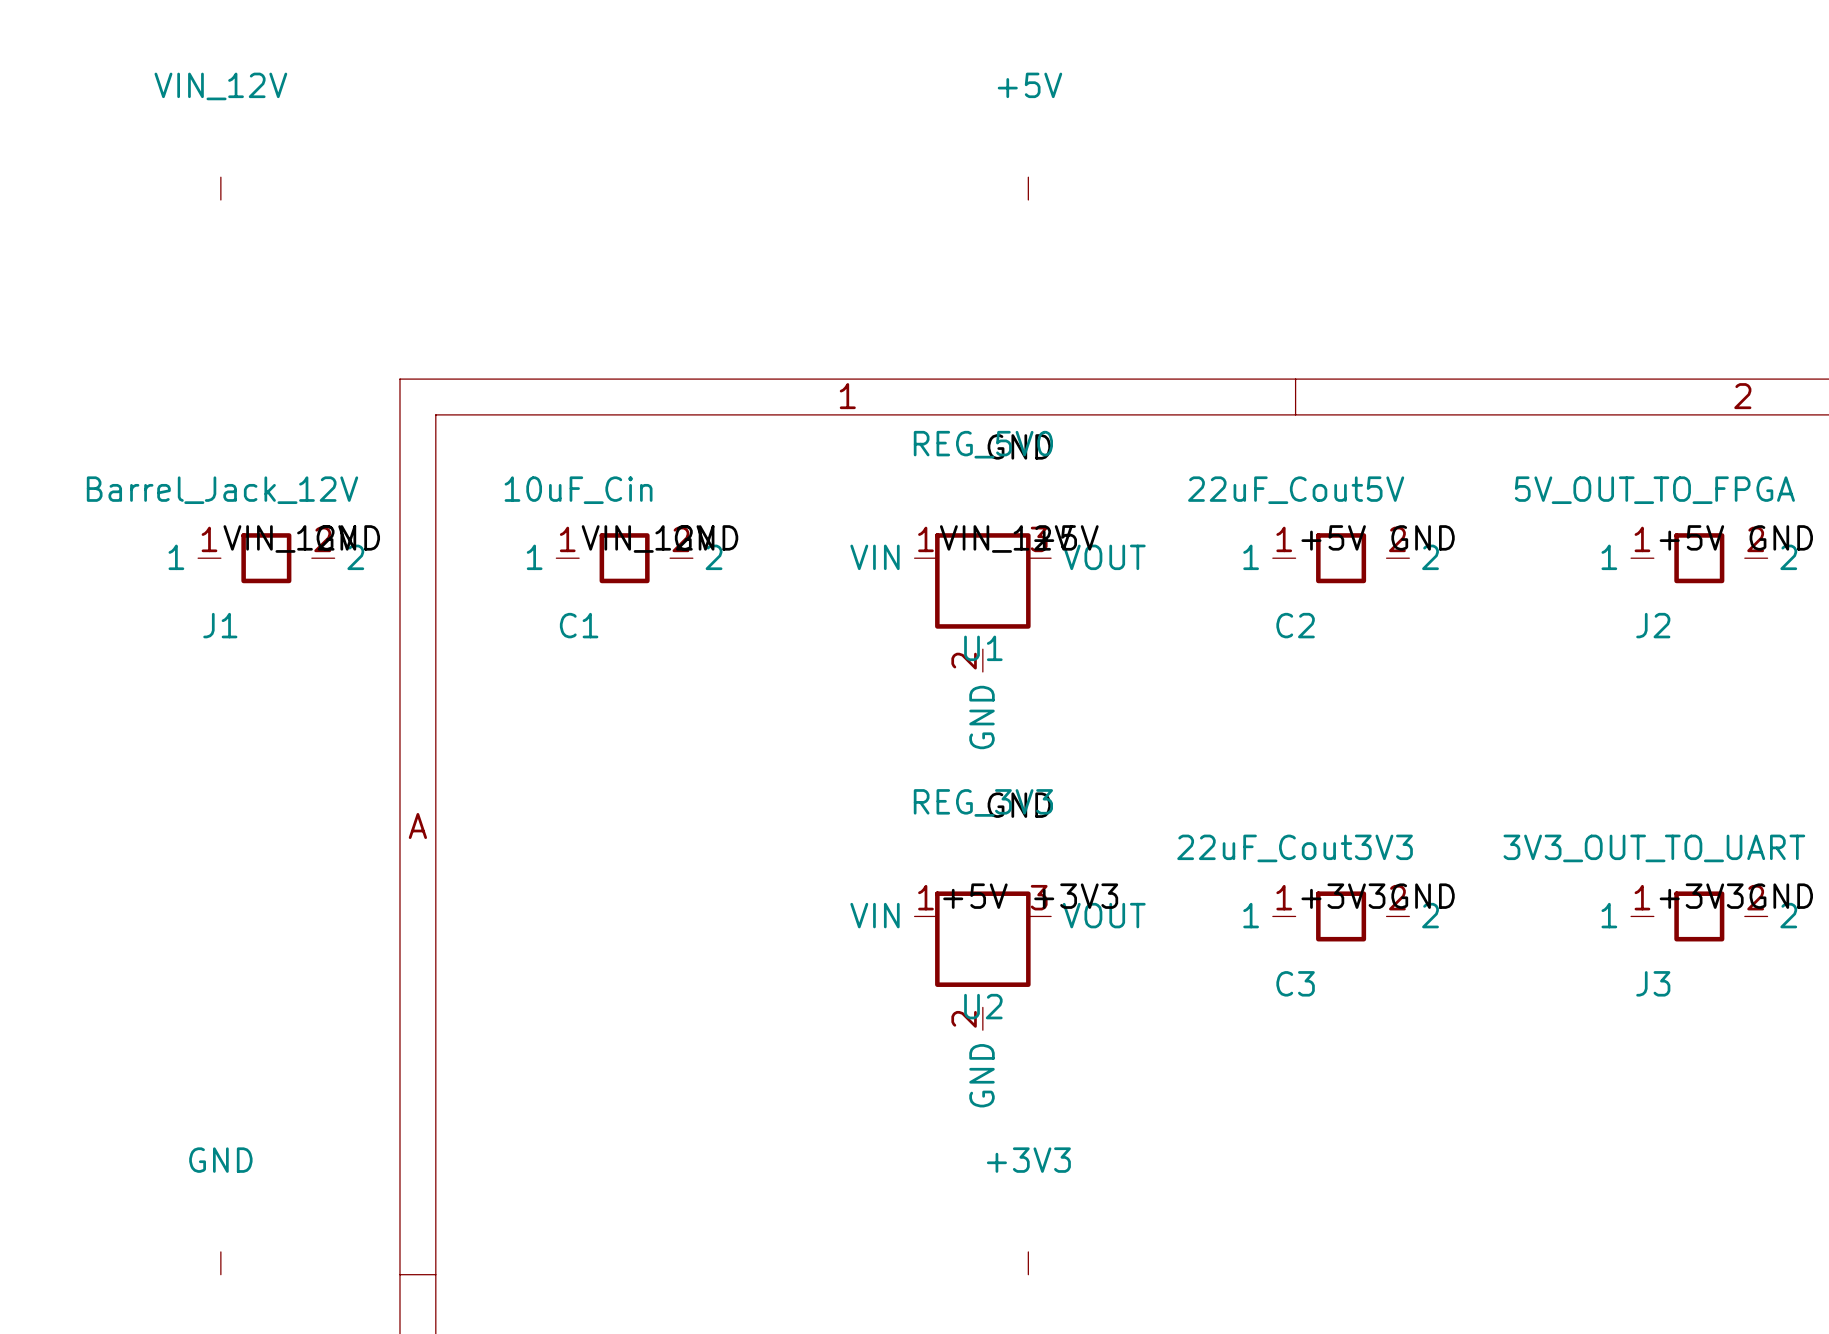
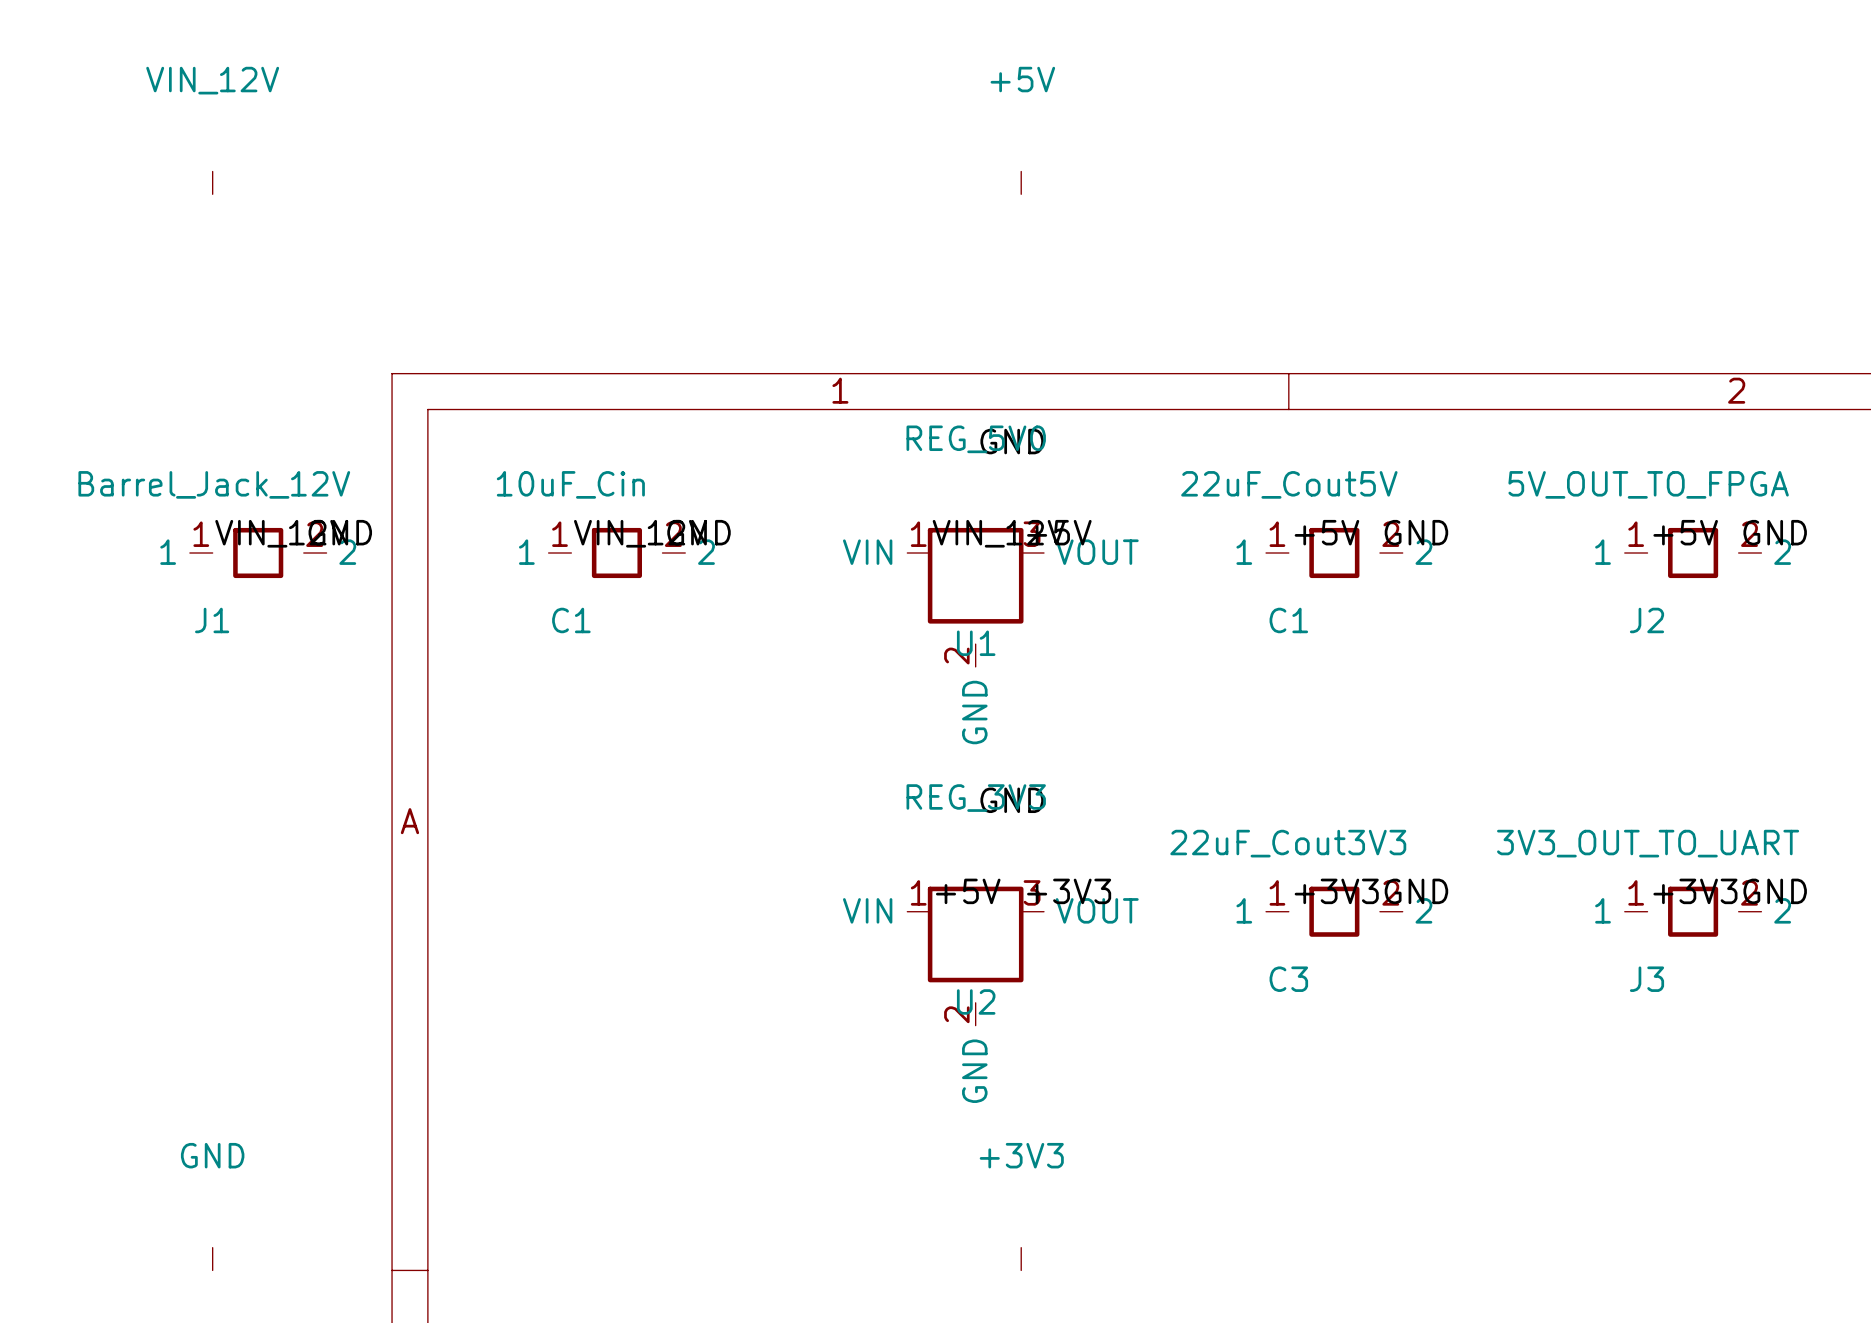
C2 name: C2 (1295, 625) -> C1 (1288, 620)

